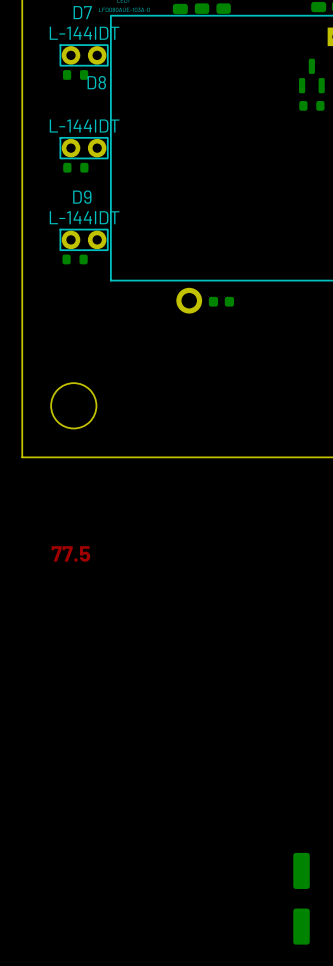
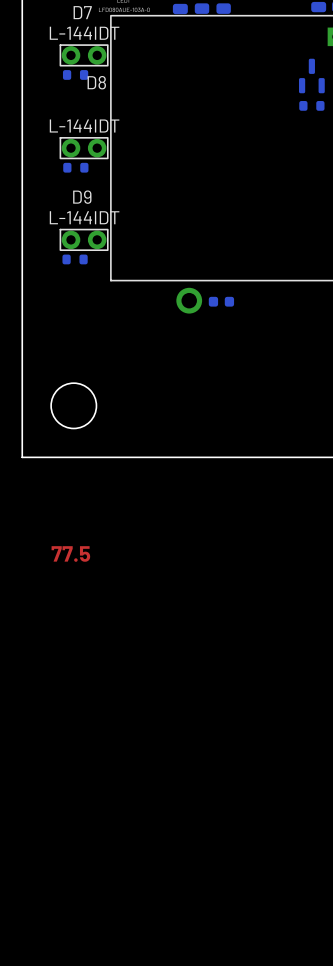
part: (301, 898) -> none

